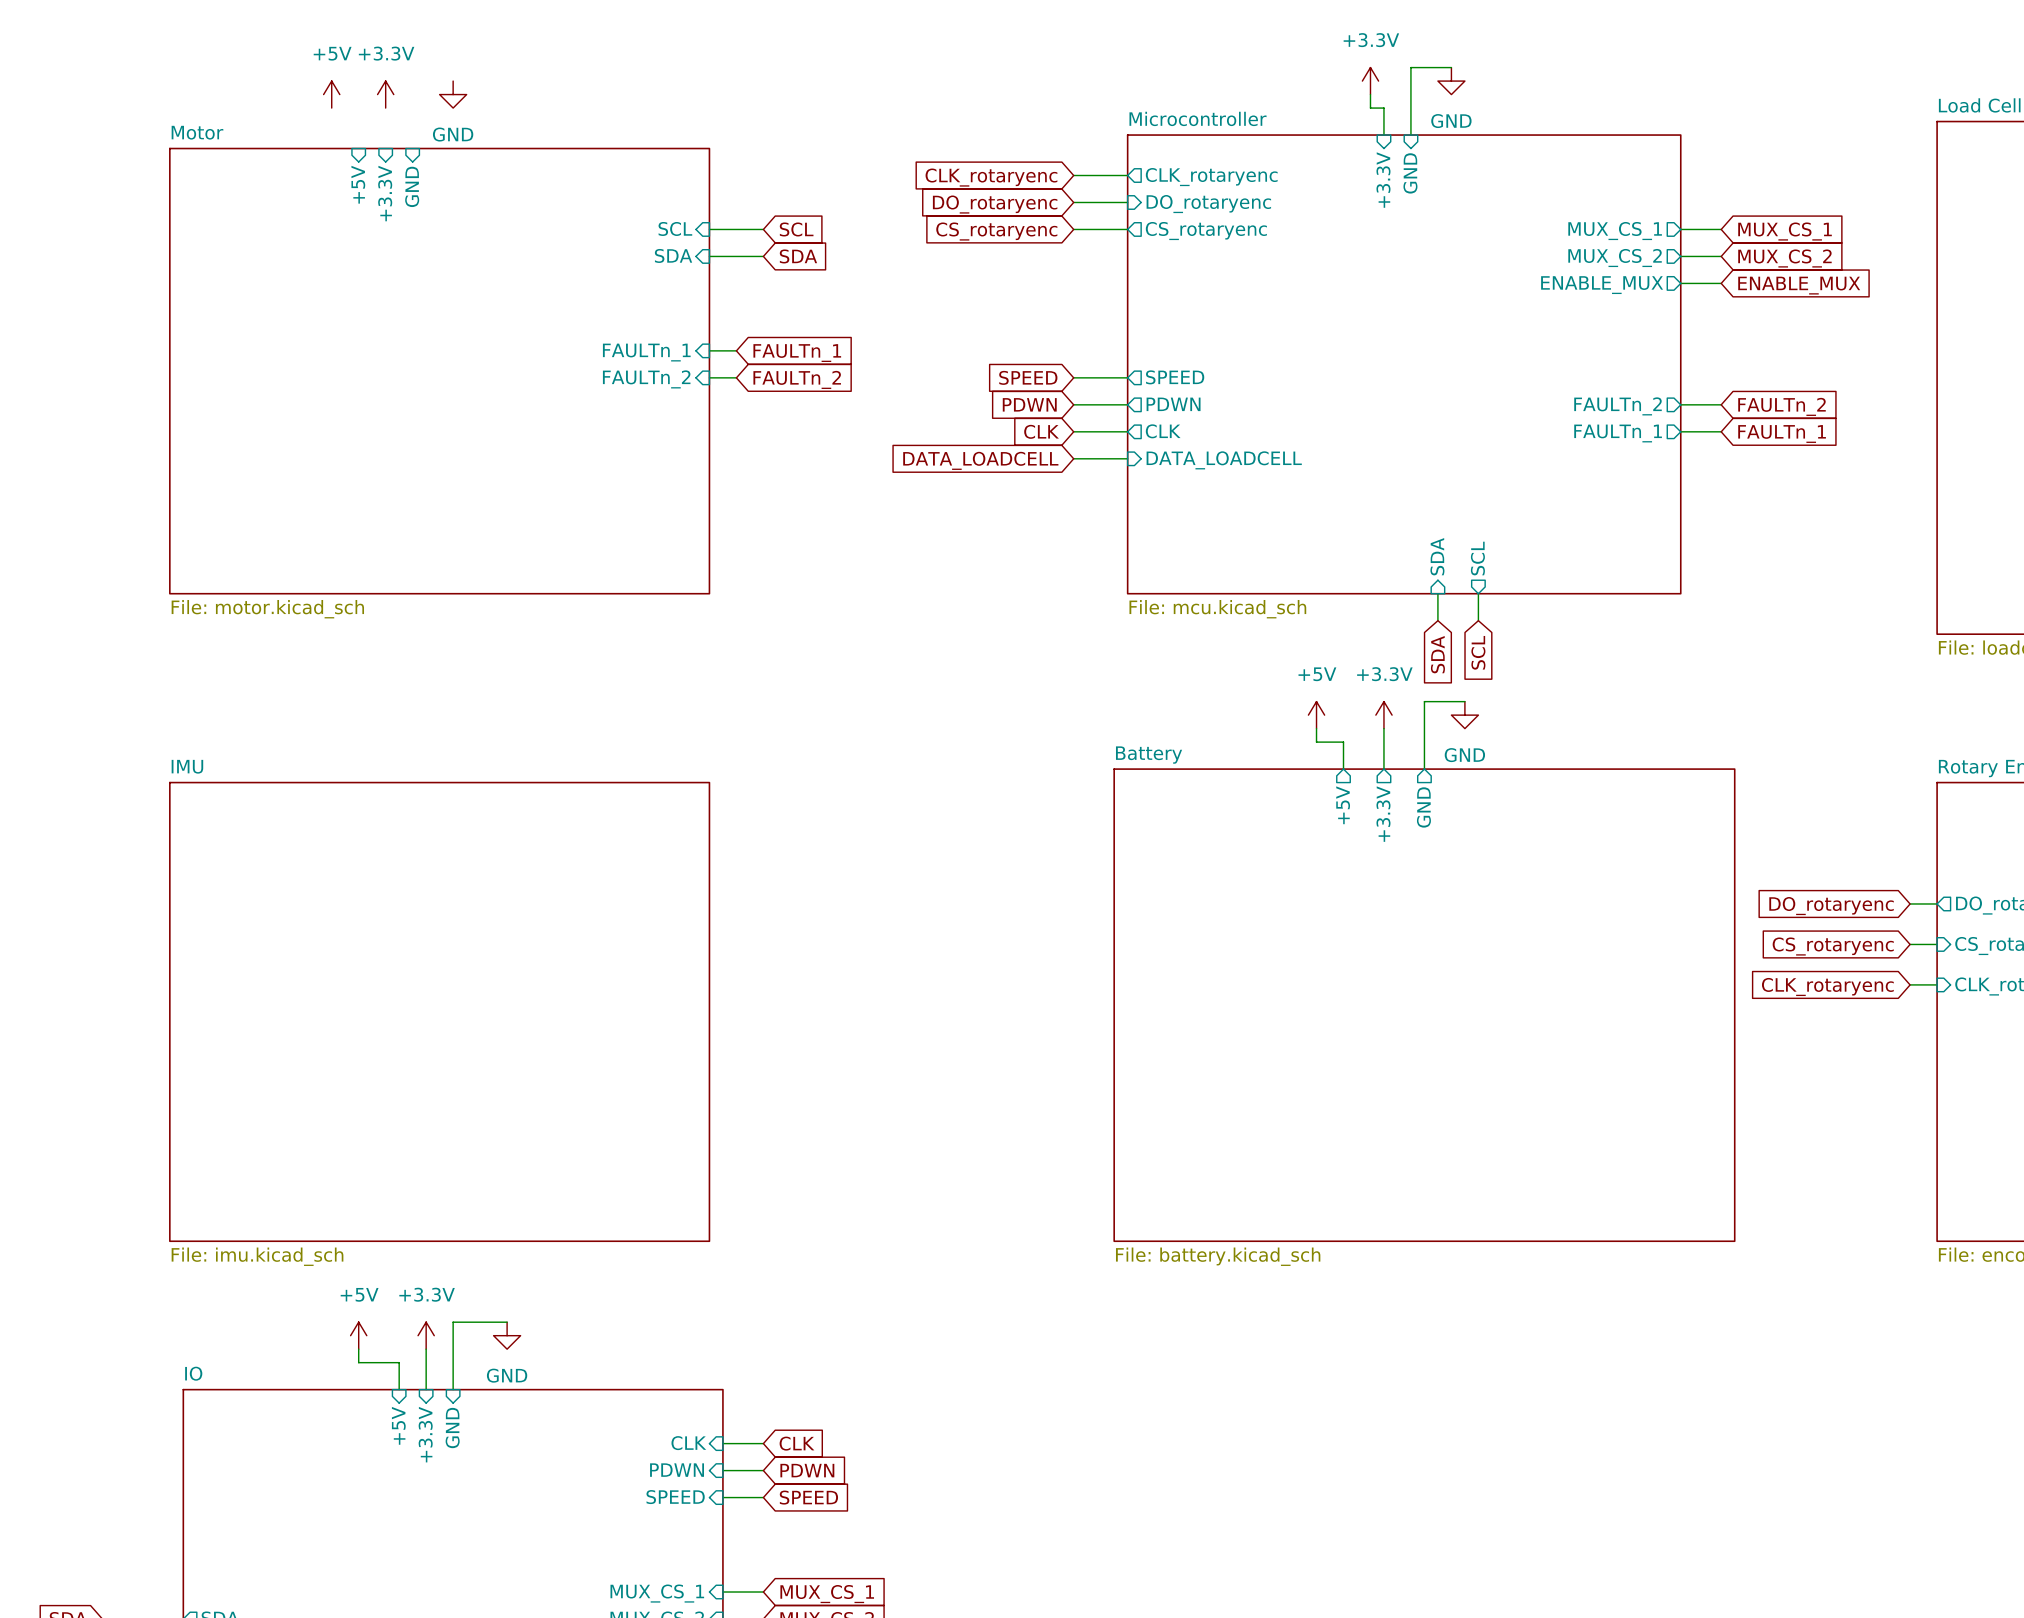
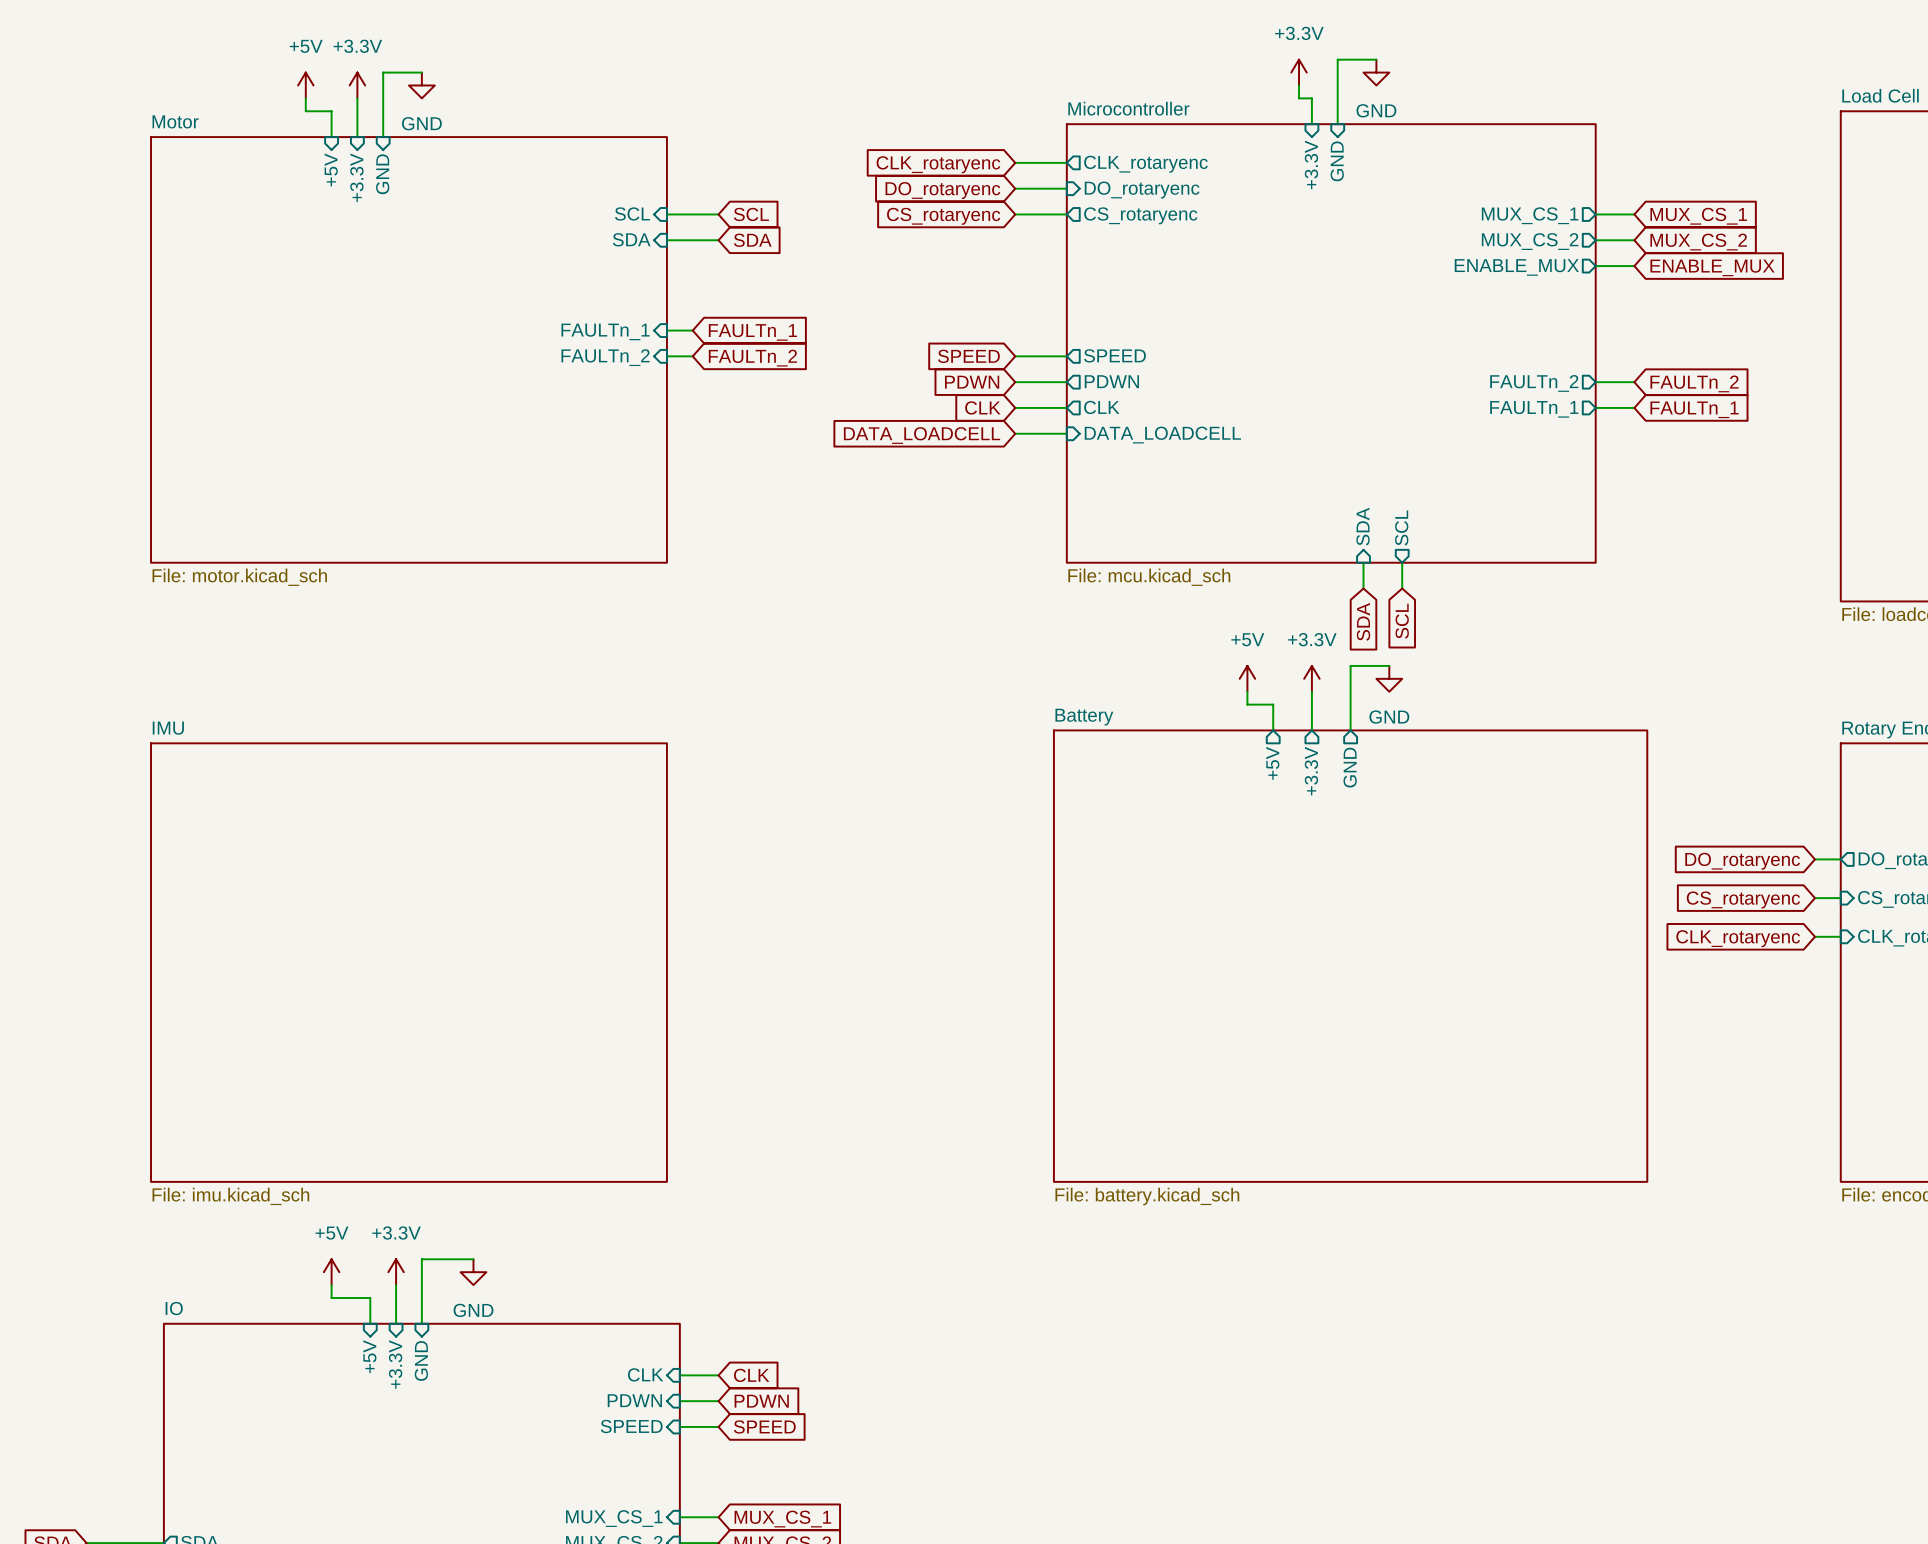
wire: none -> (421, 72) (383, 72) (383, 137)
wire: none -> (305, 98) (305, 111) (331, 111) (331, 137)
wire: none -> (357, 98) (357, 137)

